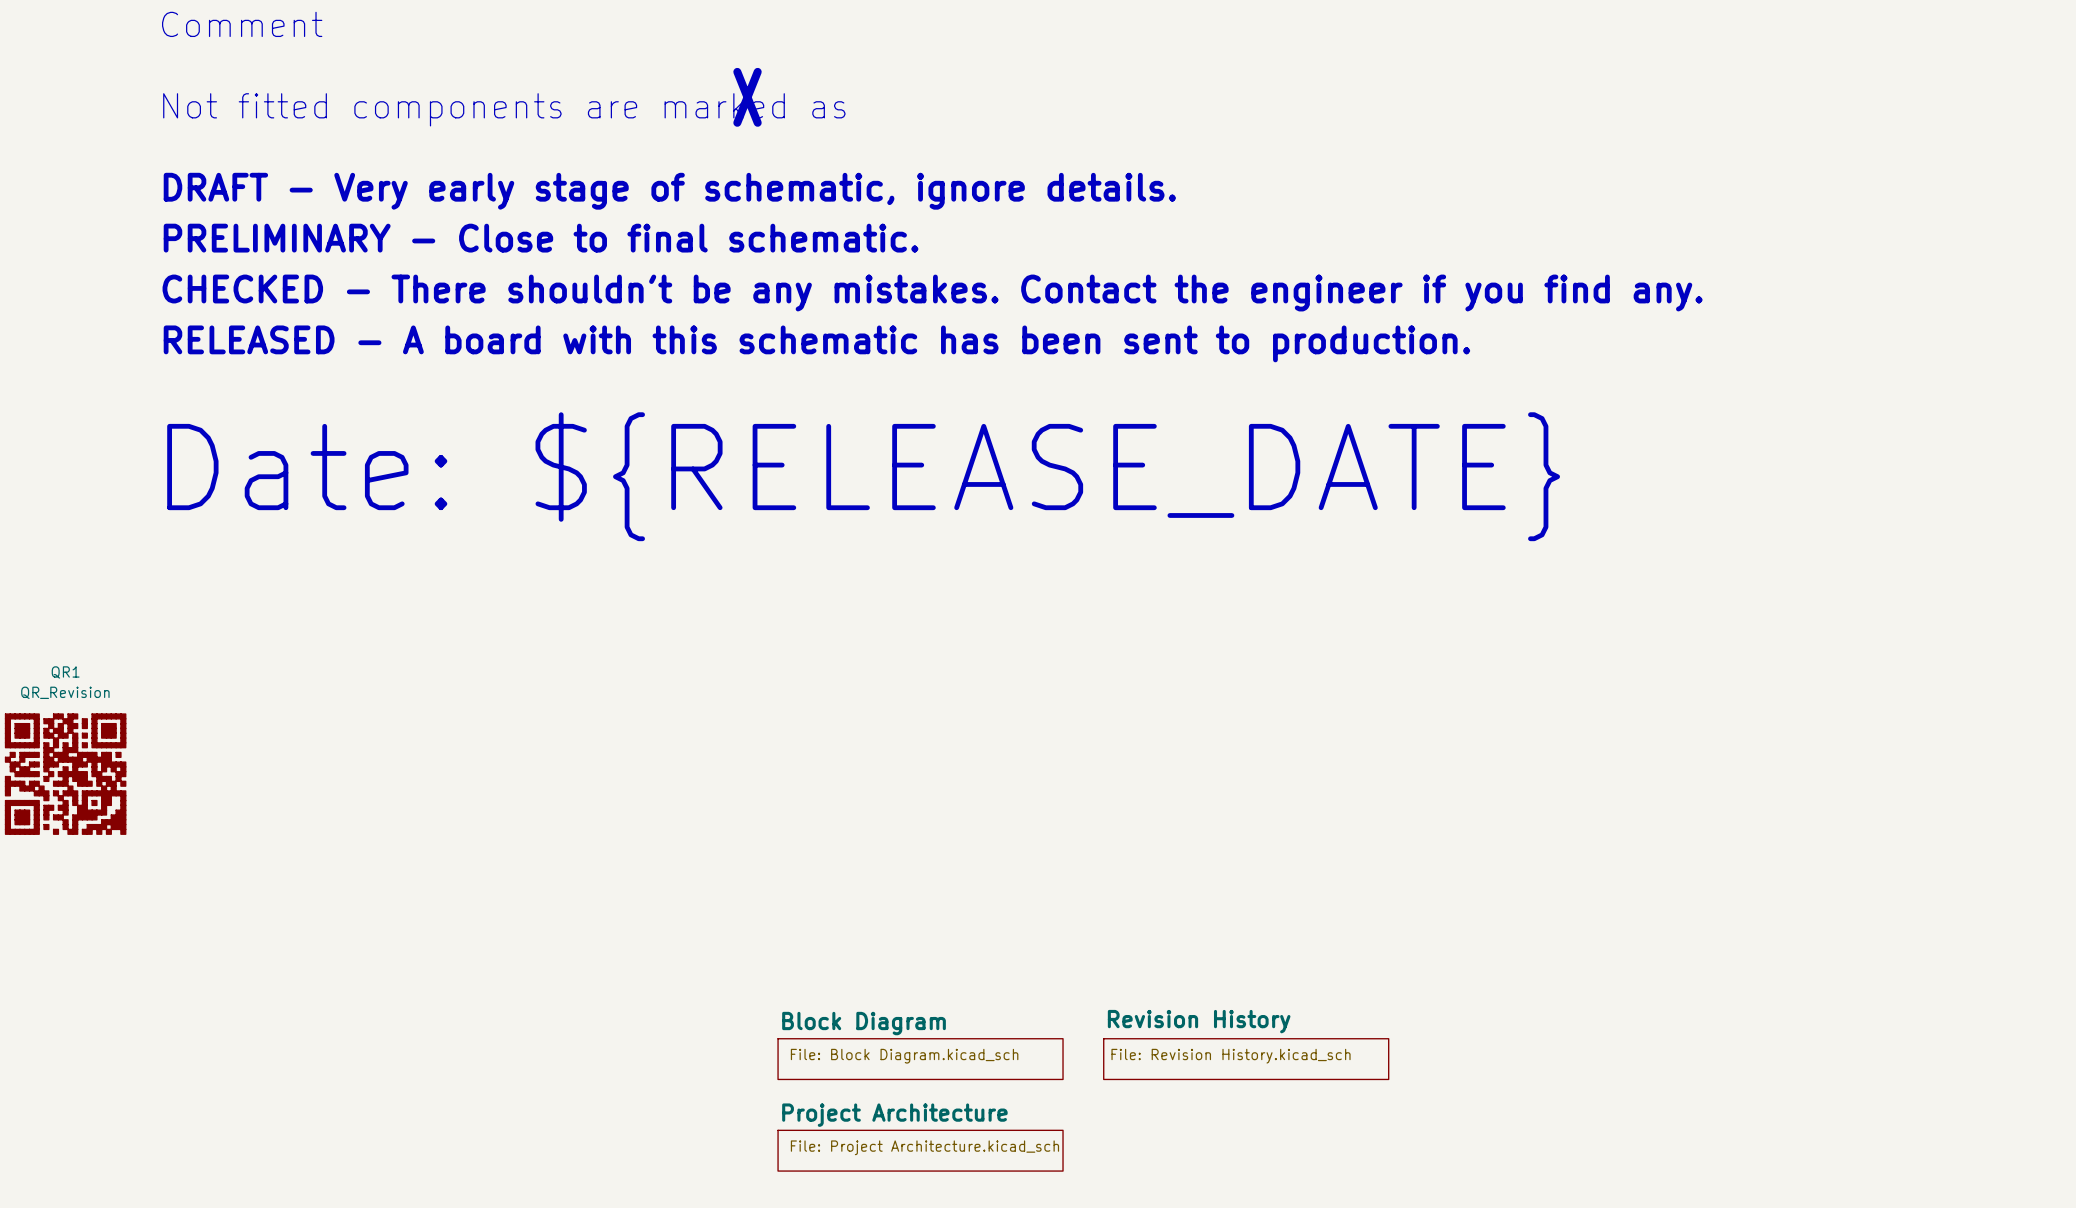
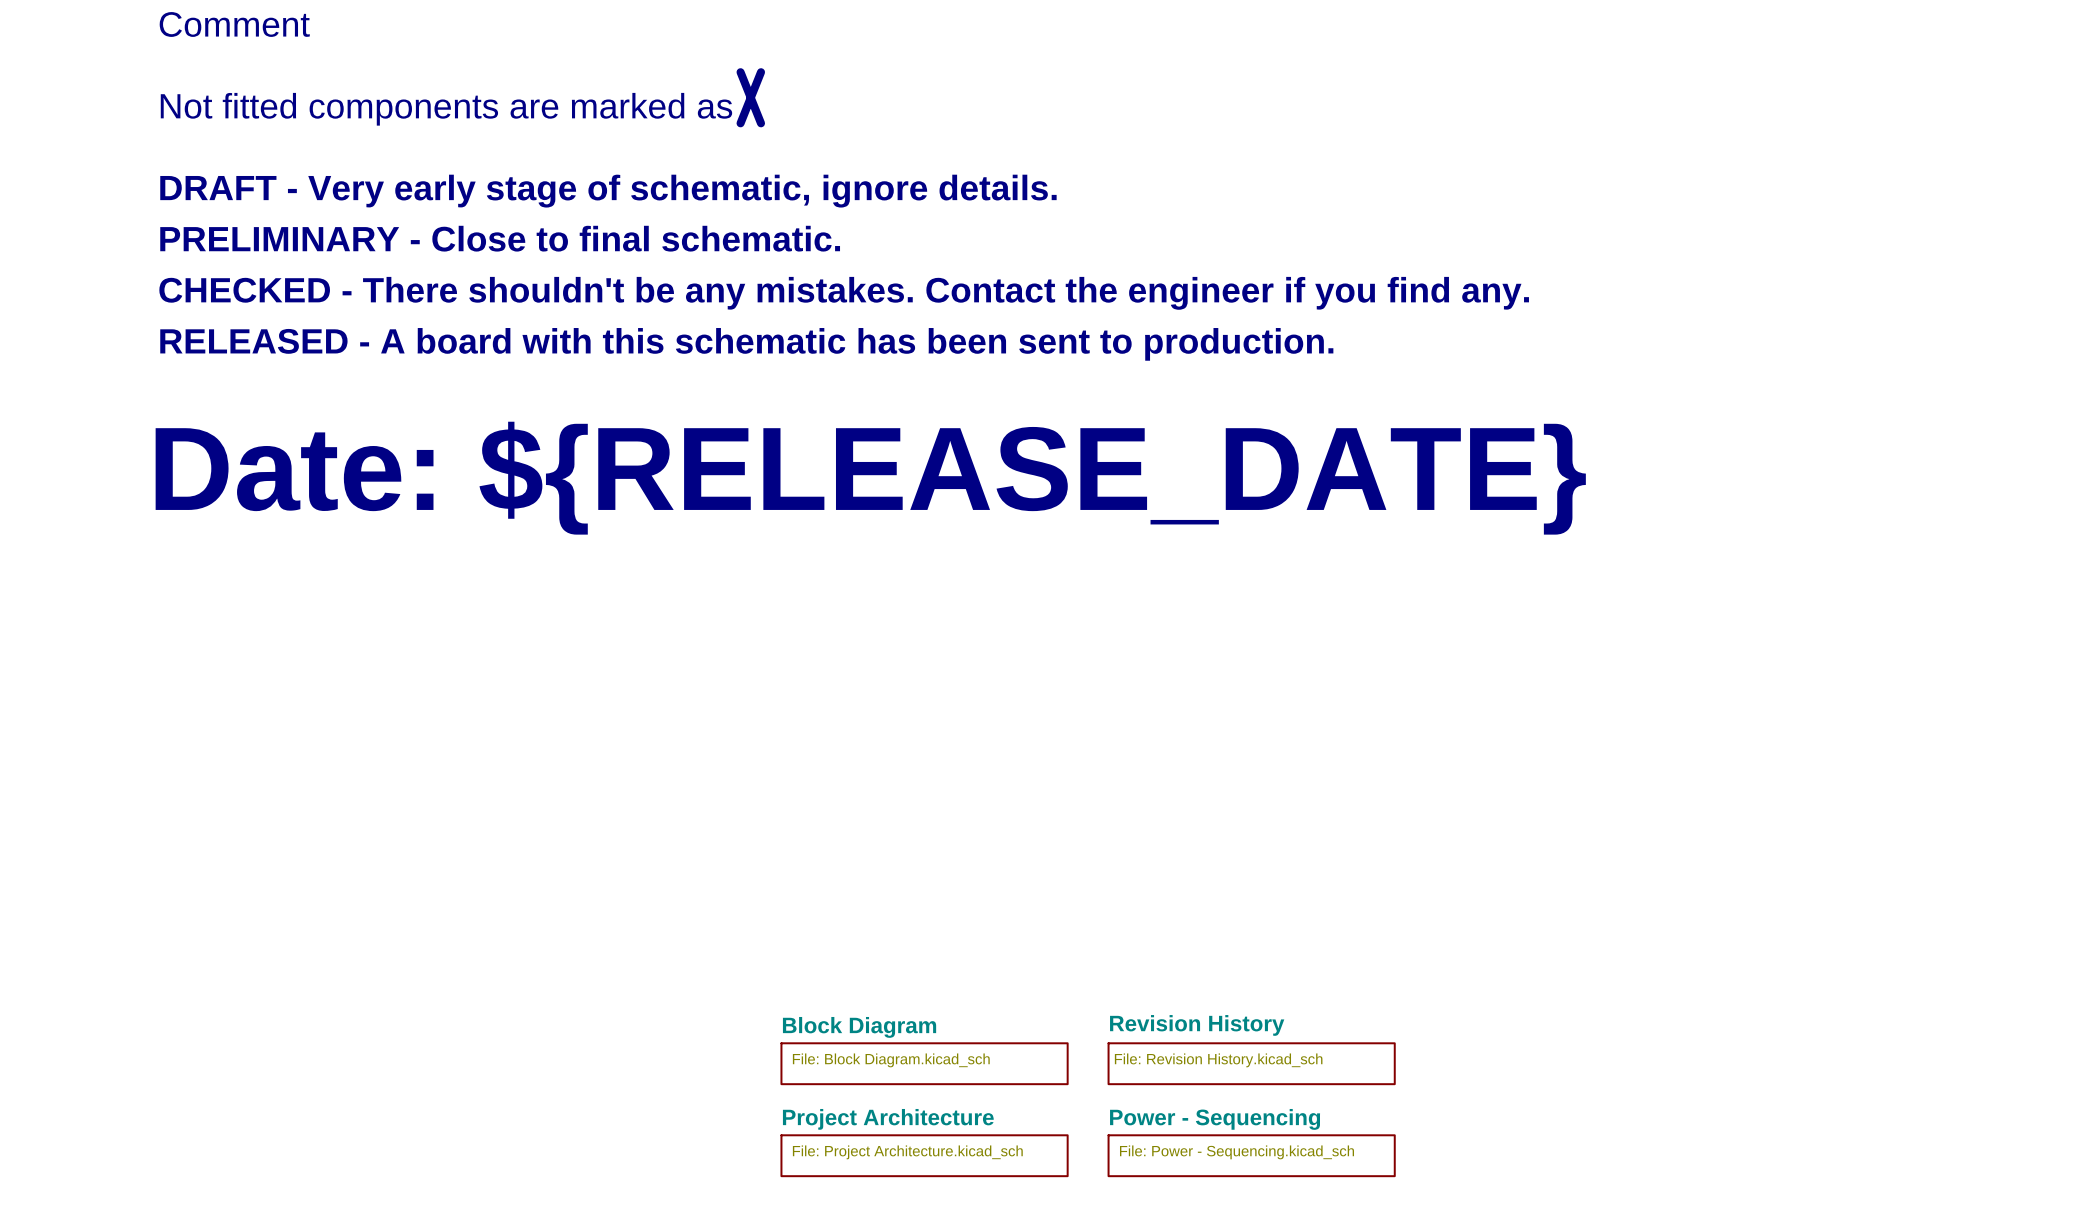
QR1: QR_Revision (65, 774) -> none
sheet Power - Sequencing: none -> File: Power - Sequencing.kicad_sch (1251, 1155)

